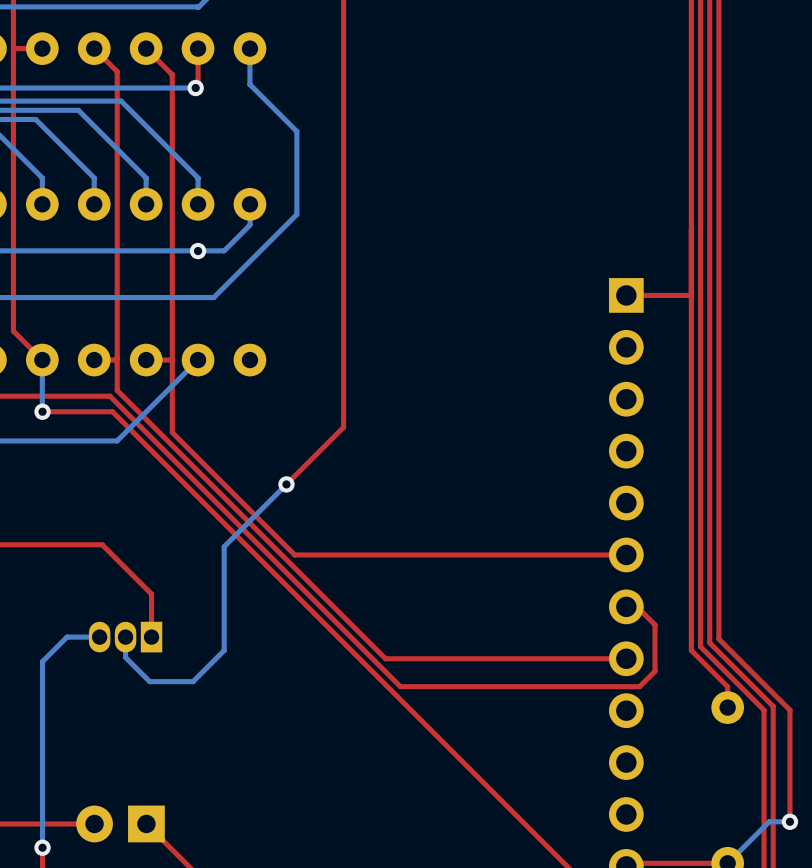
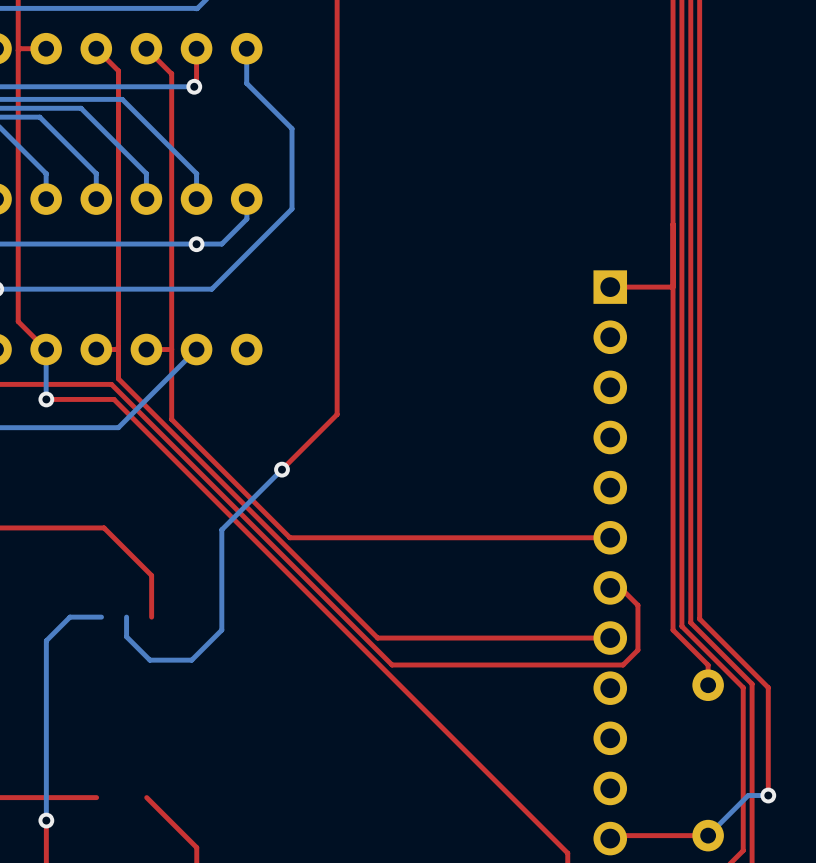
part: (125, 637) -> none
part: (120, 823) -> none

